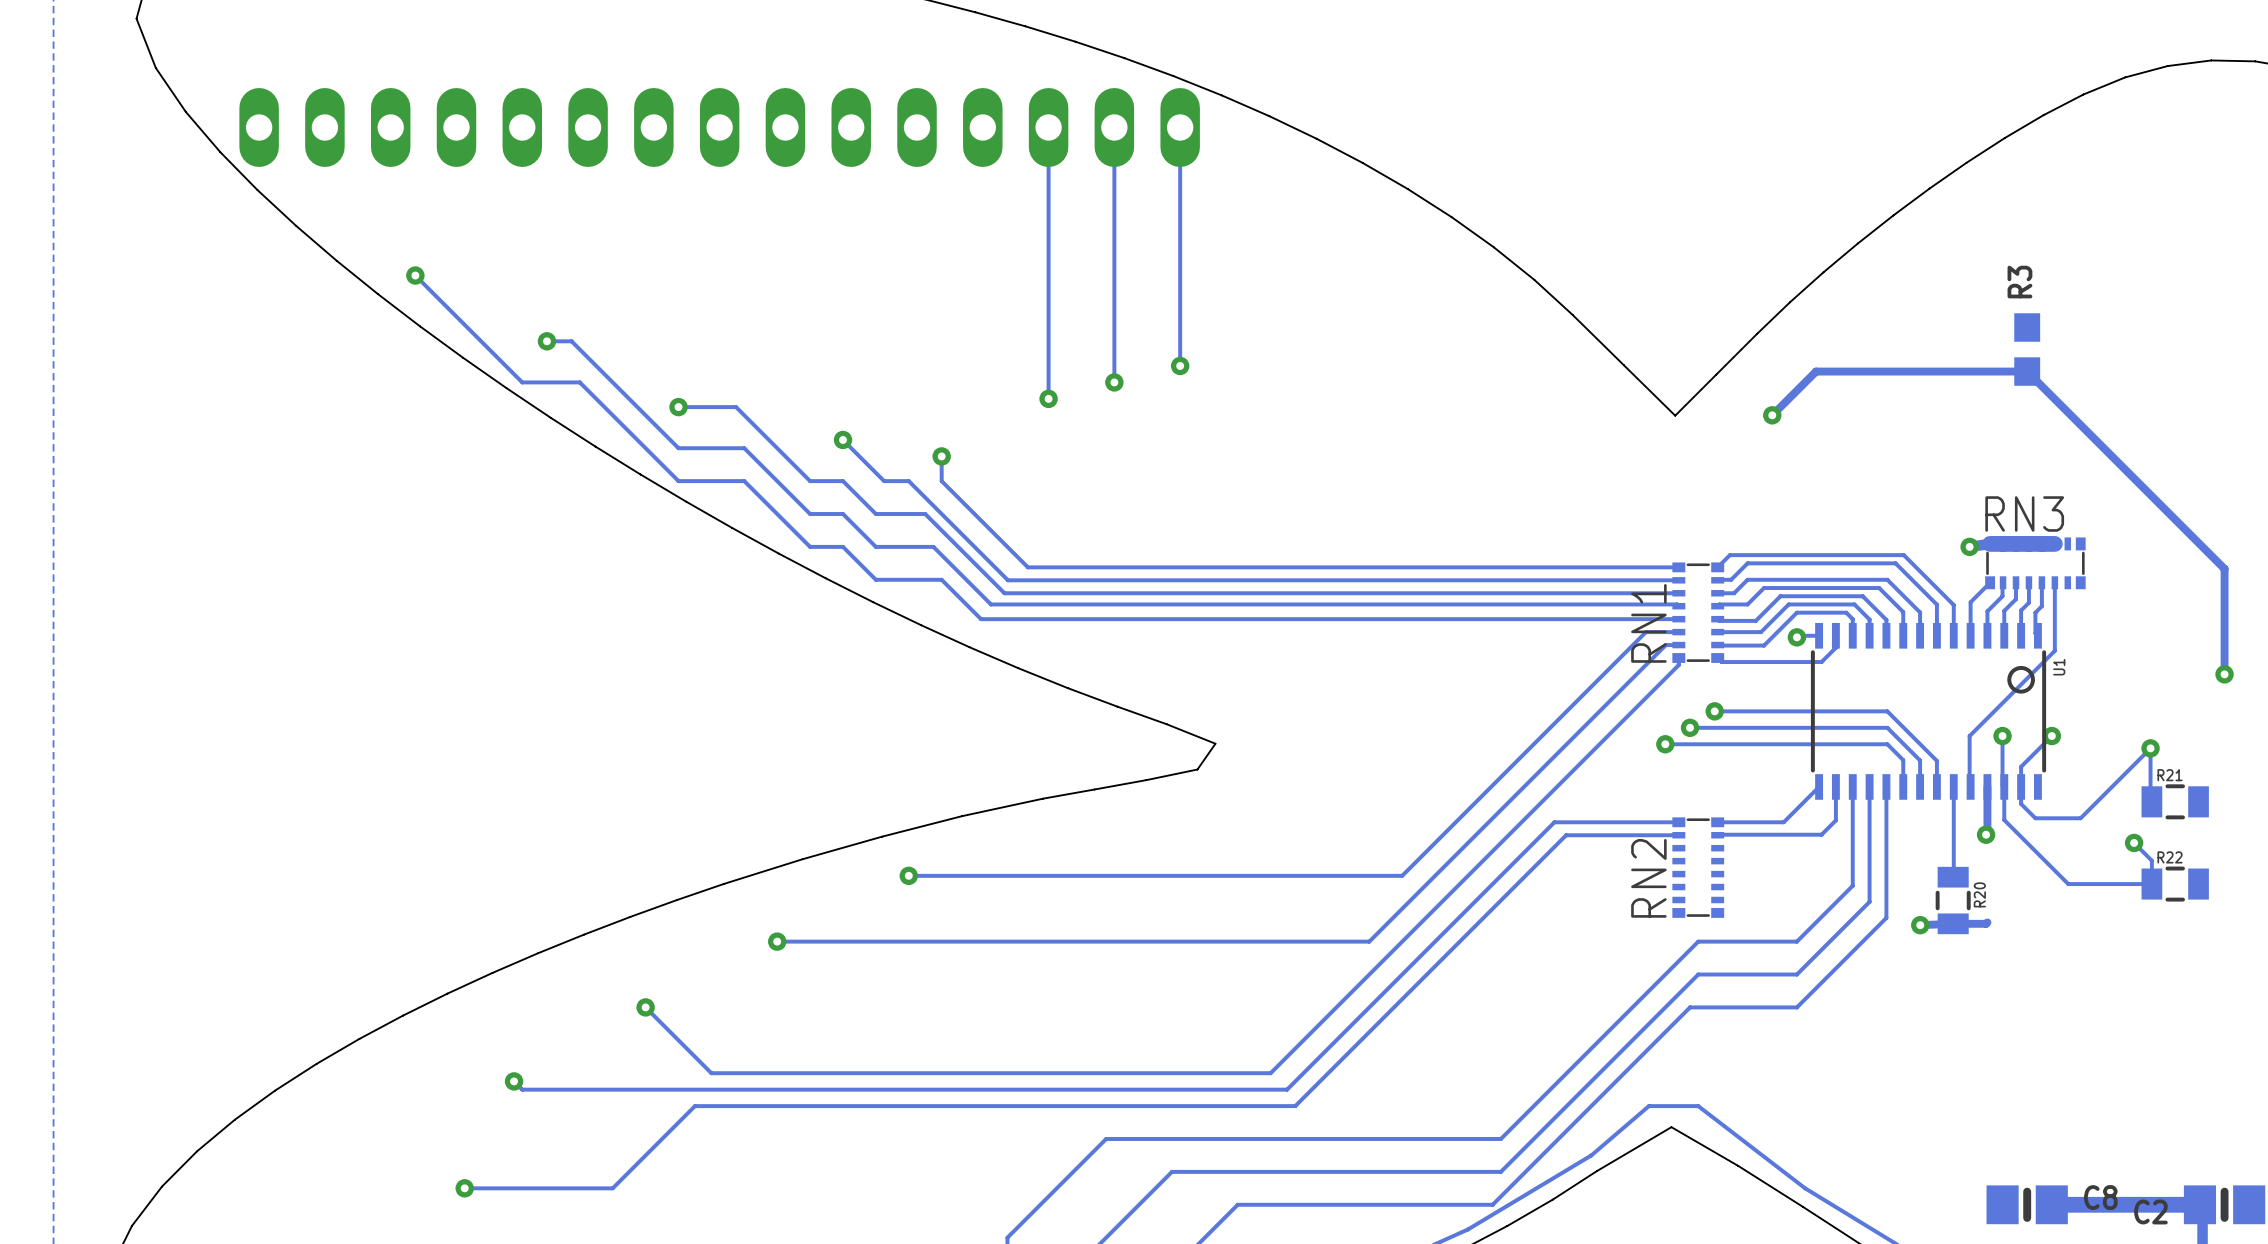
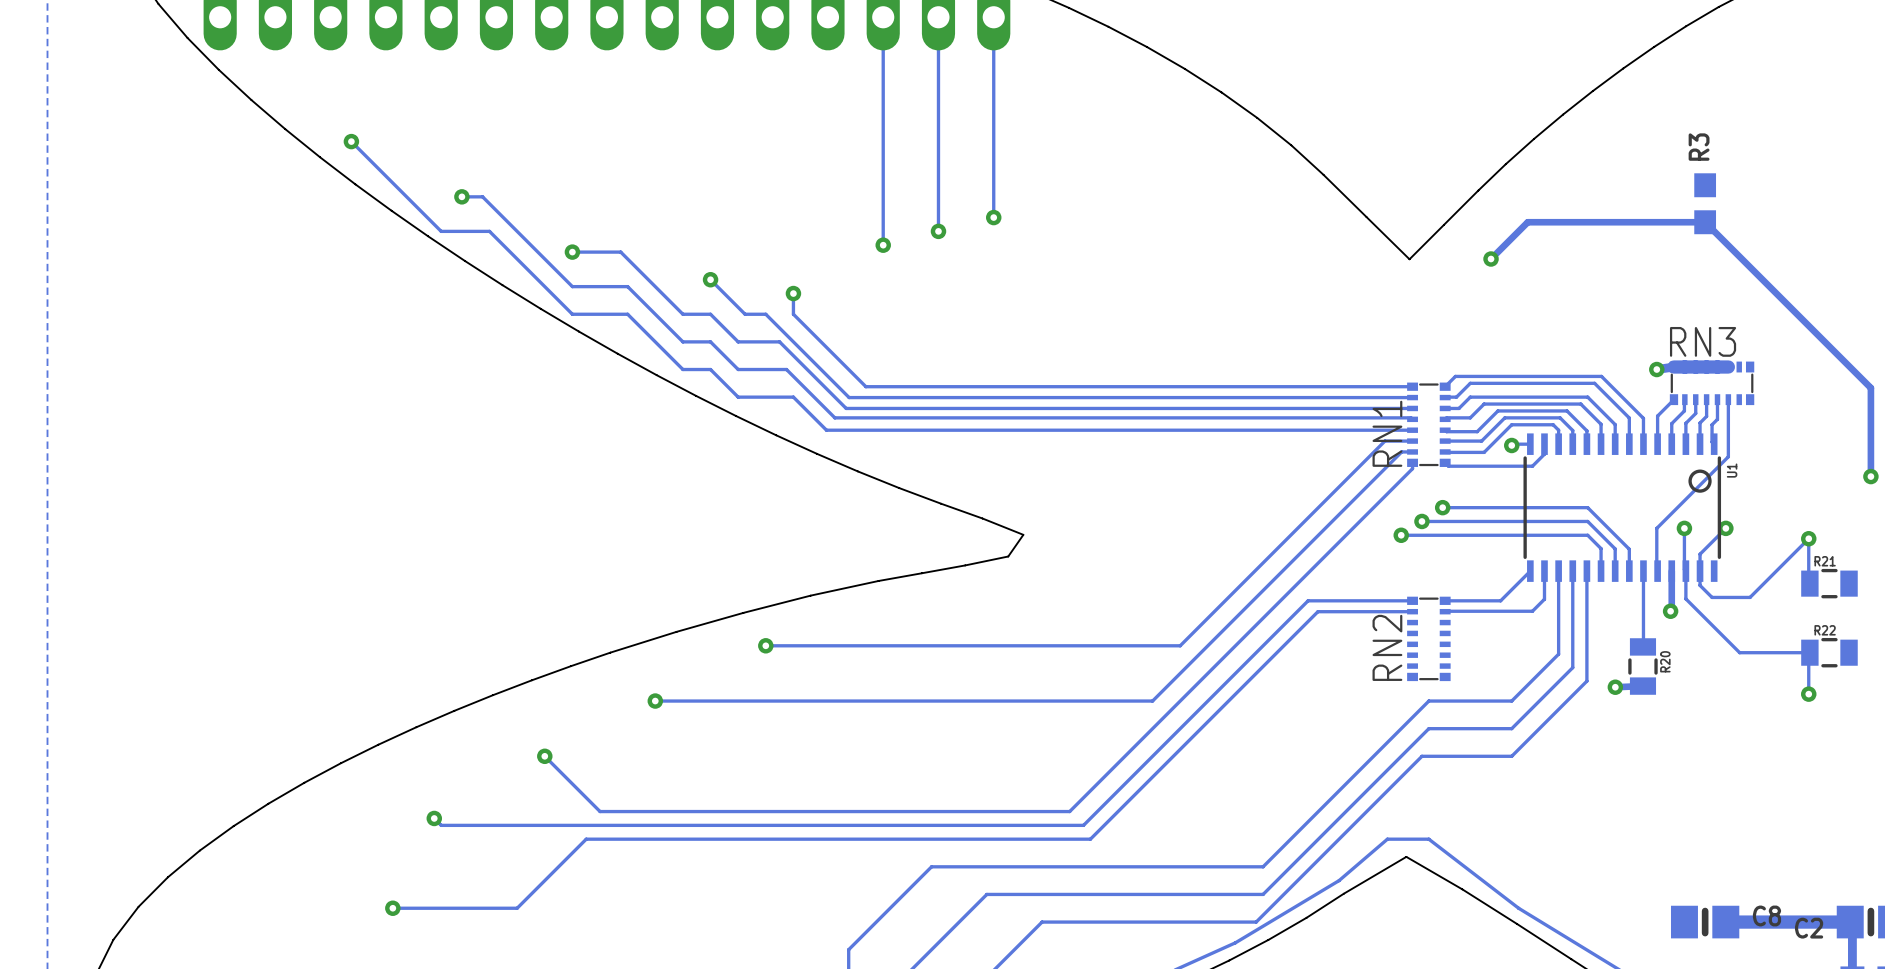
track: (2134, 842) (2151, 860) (2151, 884) -> (1808, 694) (1809, 652)
via position: (2134, 842) -> (1808, 694)
track: (1987, 922) (1953, 923) -> none

